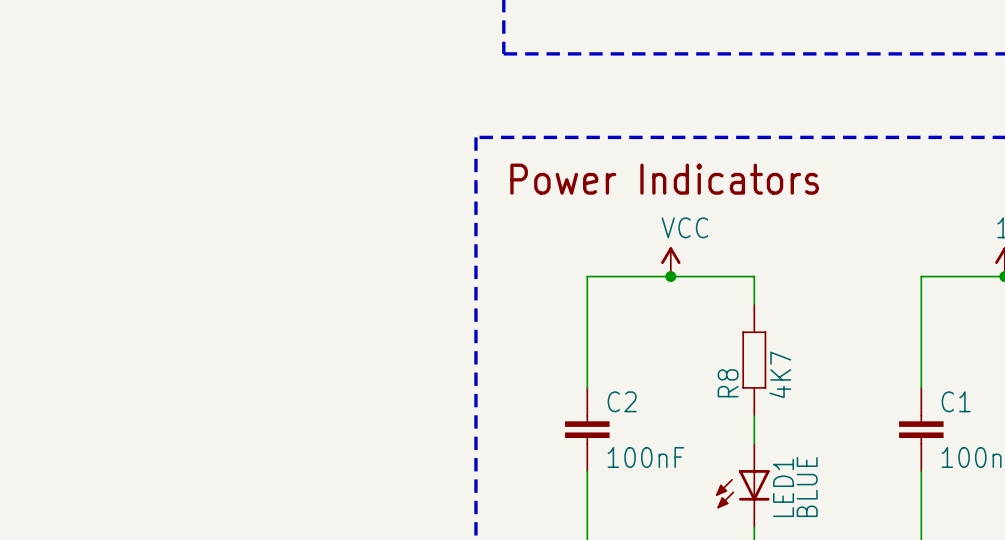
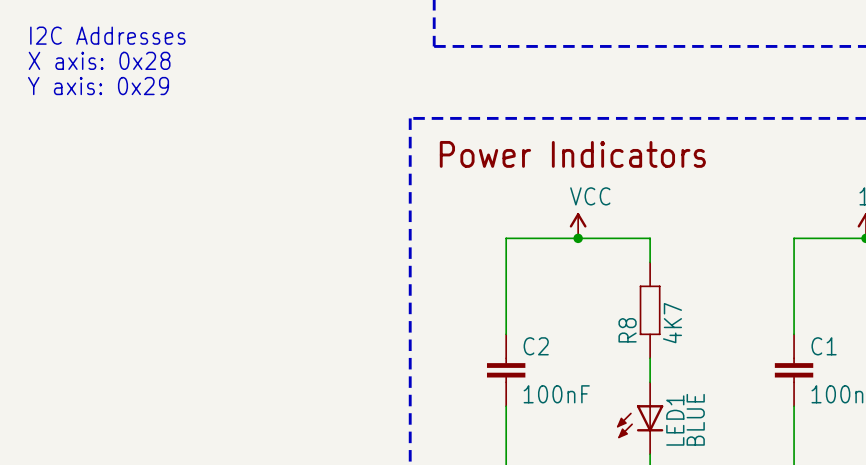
text: none -> I2C Addresses (107, 35)
text: none -> X axis: 0x28 (99, 60)
text: none -> Y axis: 0x29 (98, 86)

